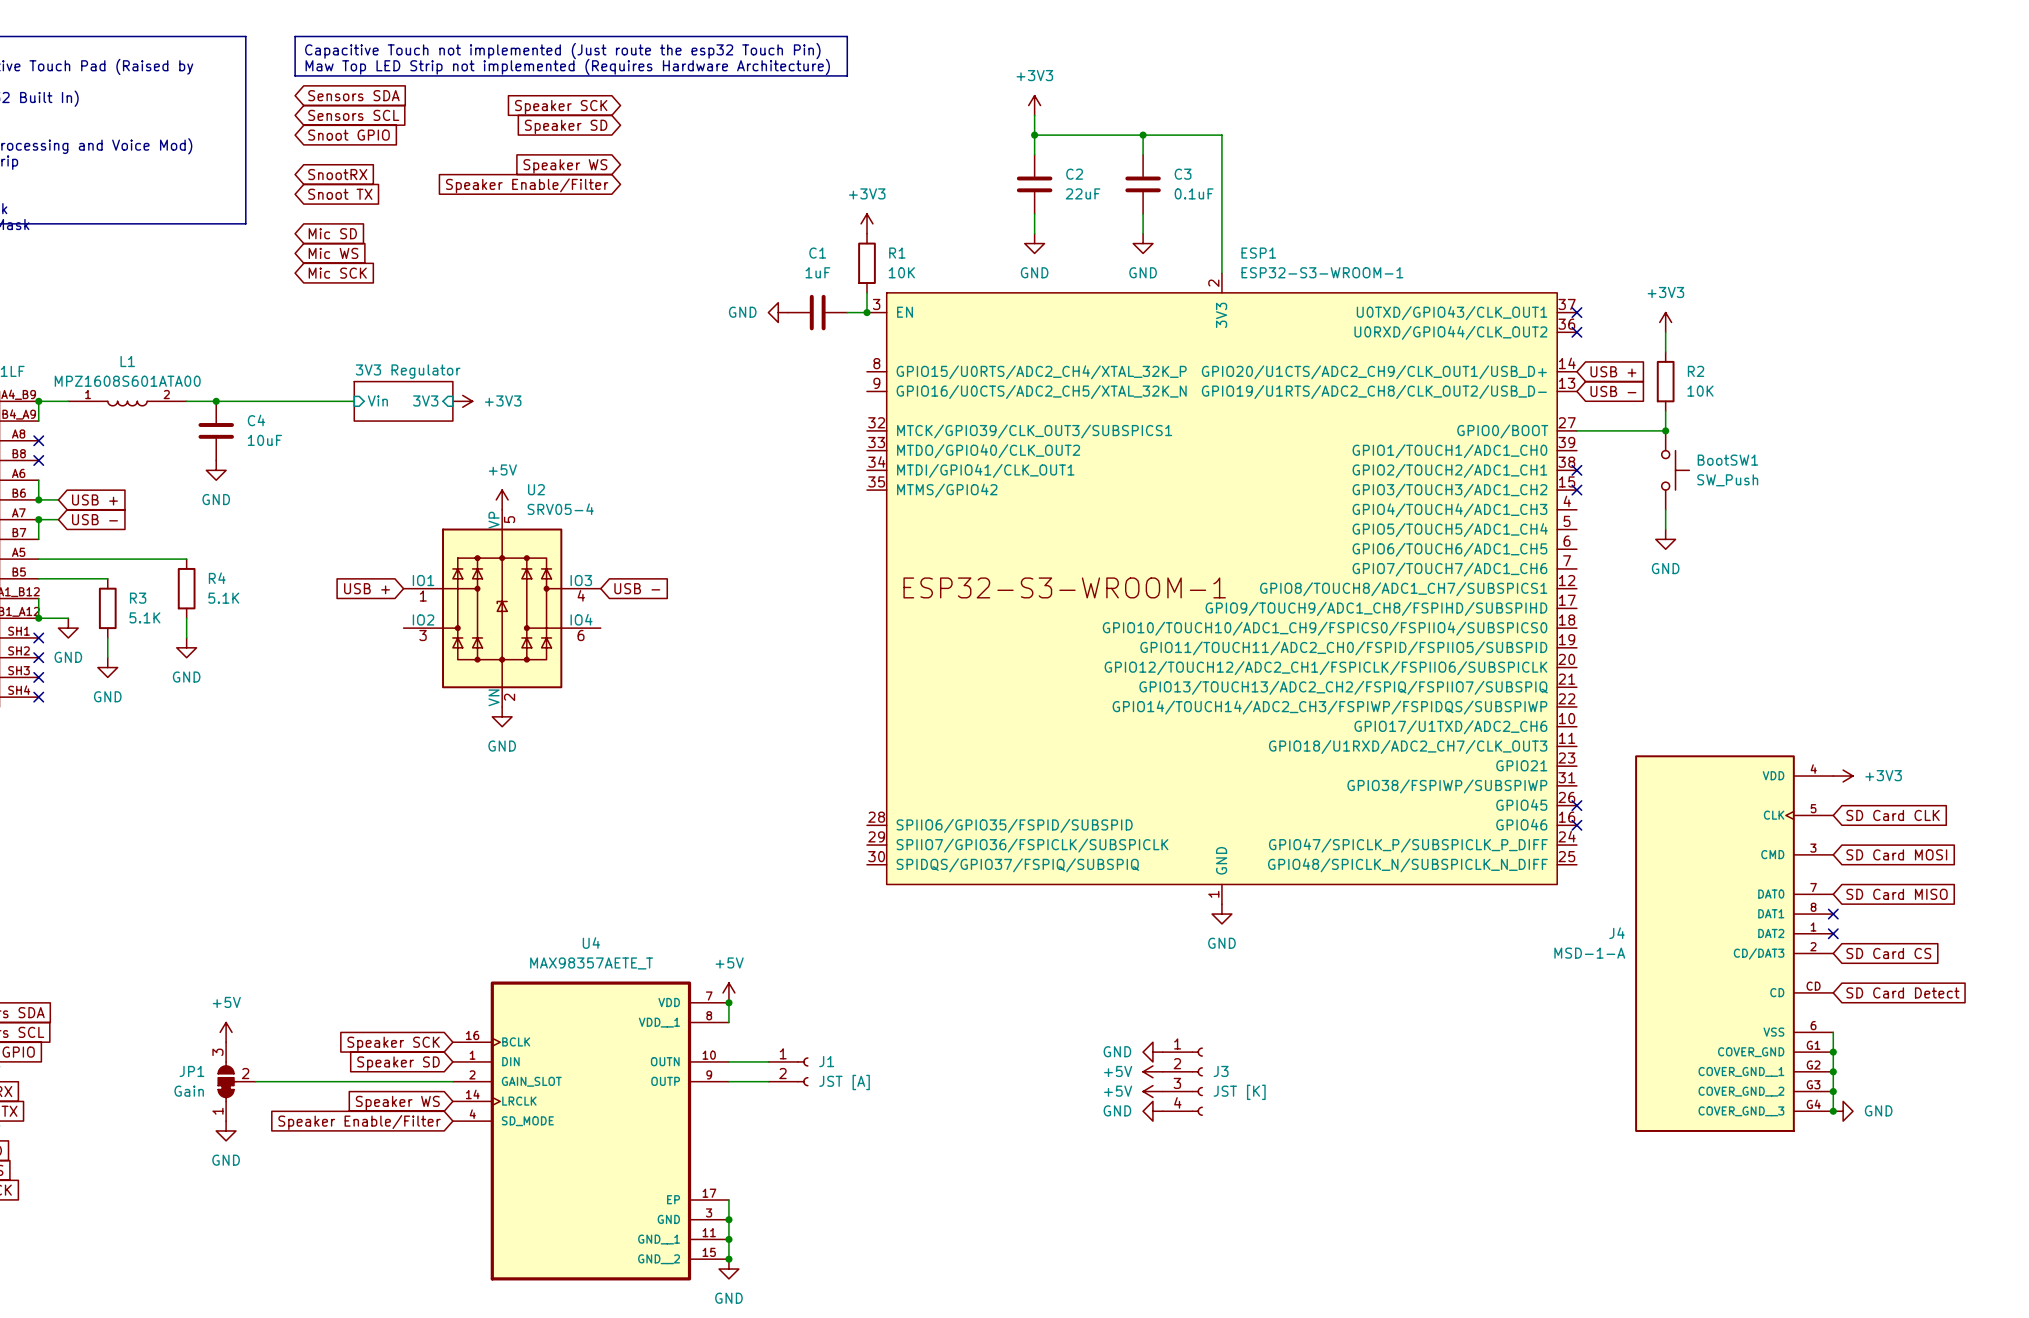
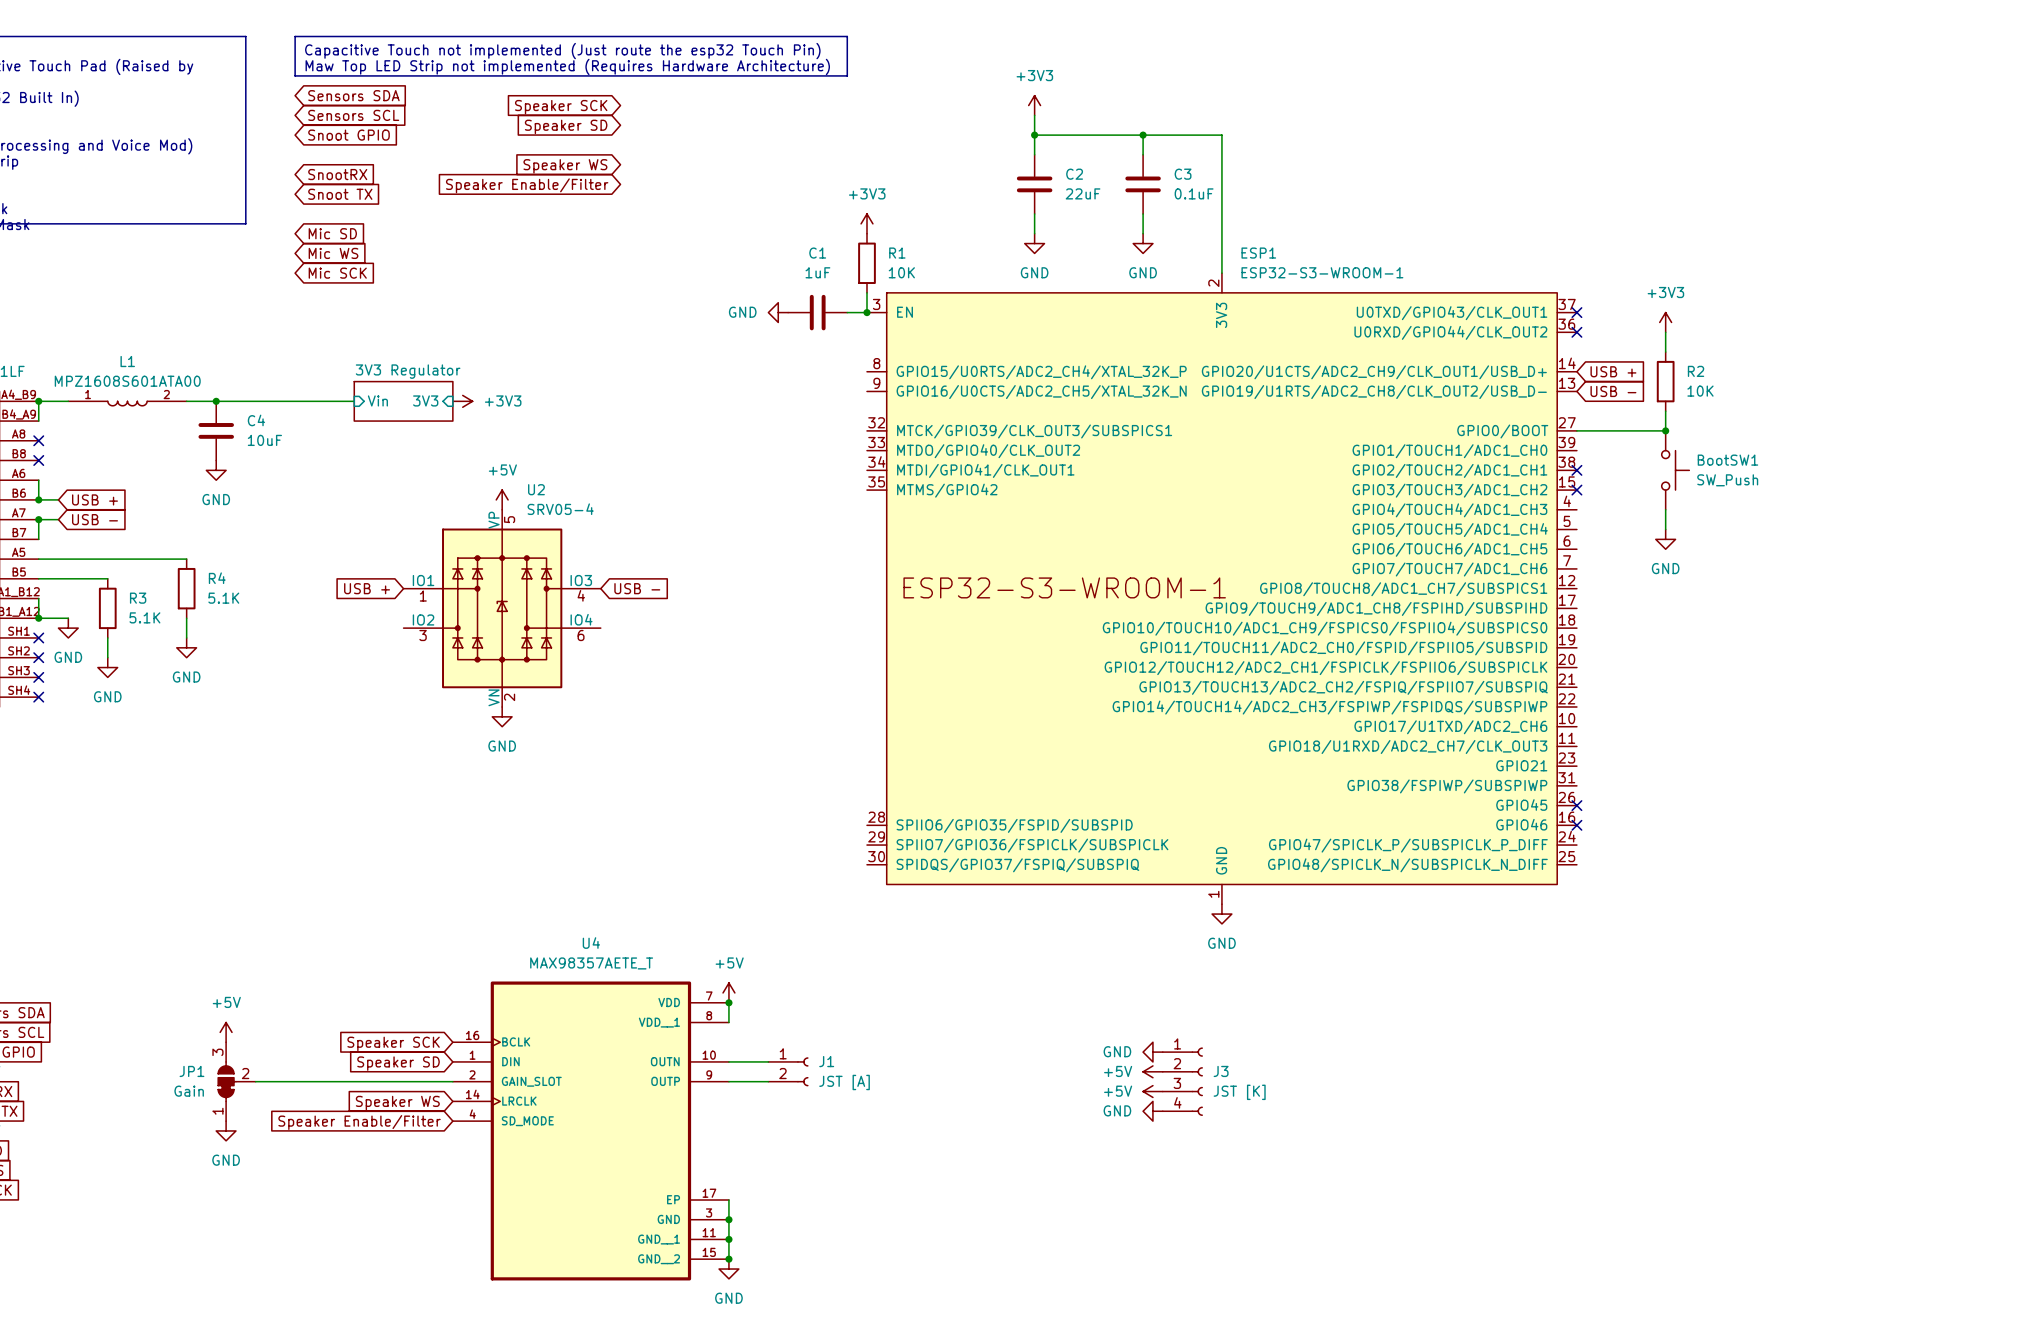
power symbol: +3V3 (1843, 776) -> none
global label: SD Card CLK (1893, 815) -> none
global label: SD Card MOSI (1896, 854) -> none
global label: SD Card MISO (1897, 894) -> none
no-connect mark: (1833, 914) -> none
no-connect mark: (1833, 933) -> none
J4: MSD-1-A (1734, 943) -> none
global label: SD Card CS (1888, 953) -> none
global label: SD Card Detect (1902, 992) -> none
wire: (1833, 1032) (1833, 1111) -> none
junction: (1833, 1052) -> none
junction: (1833, 1071) -> none
junction: (1833, 1091) -> none
junction: (1833, 1111) -> none
power symbol: GND (1843, 1111) -> none

